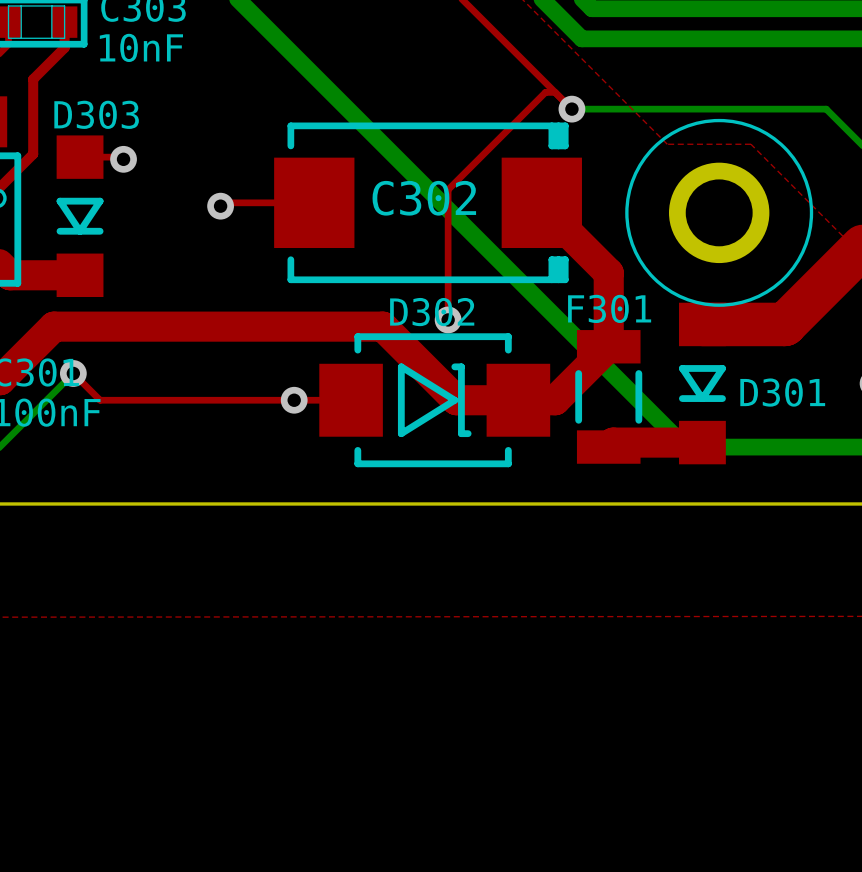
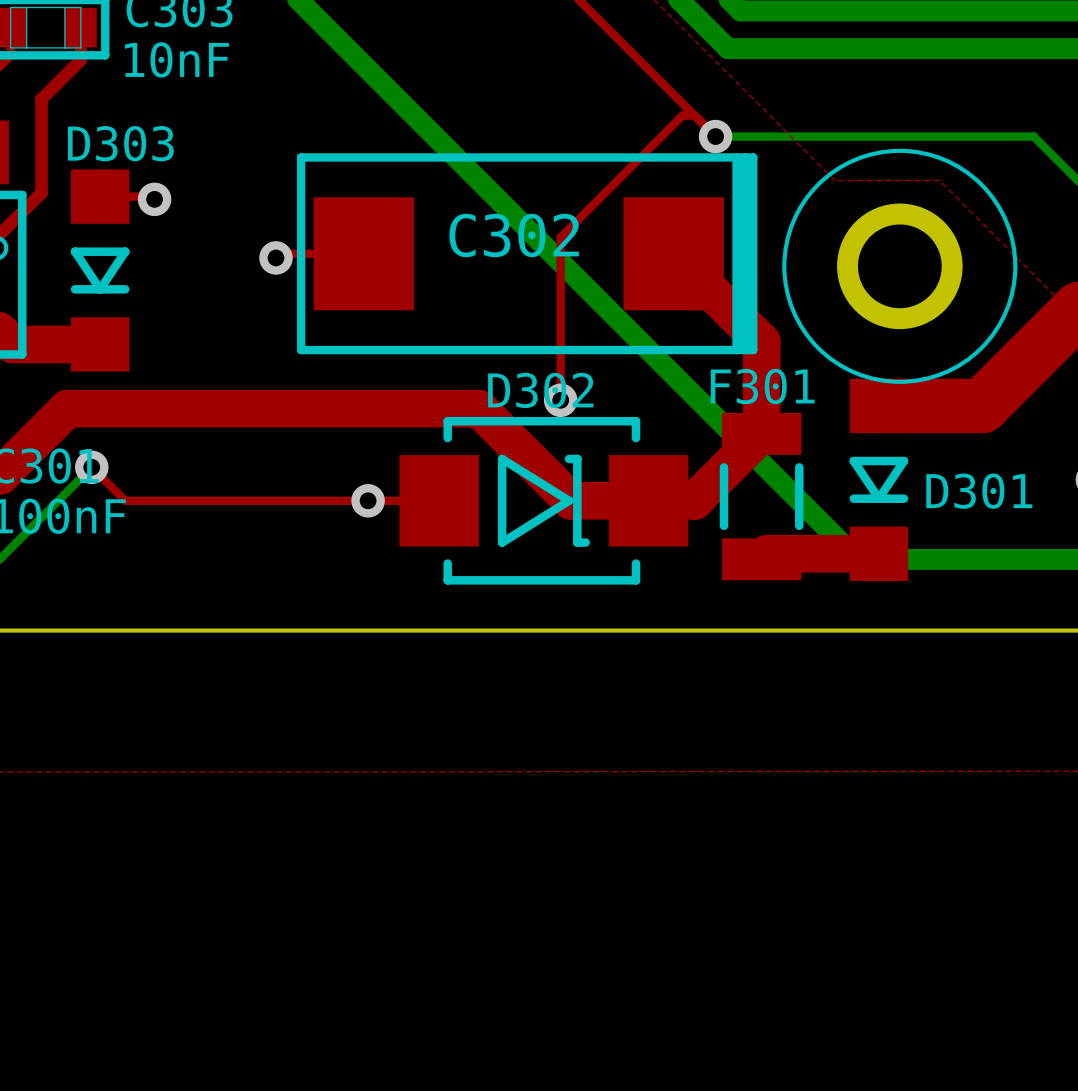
C302 footprint: [274, 122, 582, 284] -> [296, 153, 758, 355]

